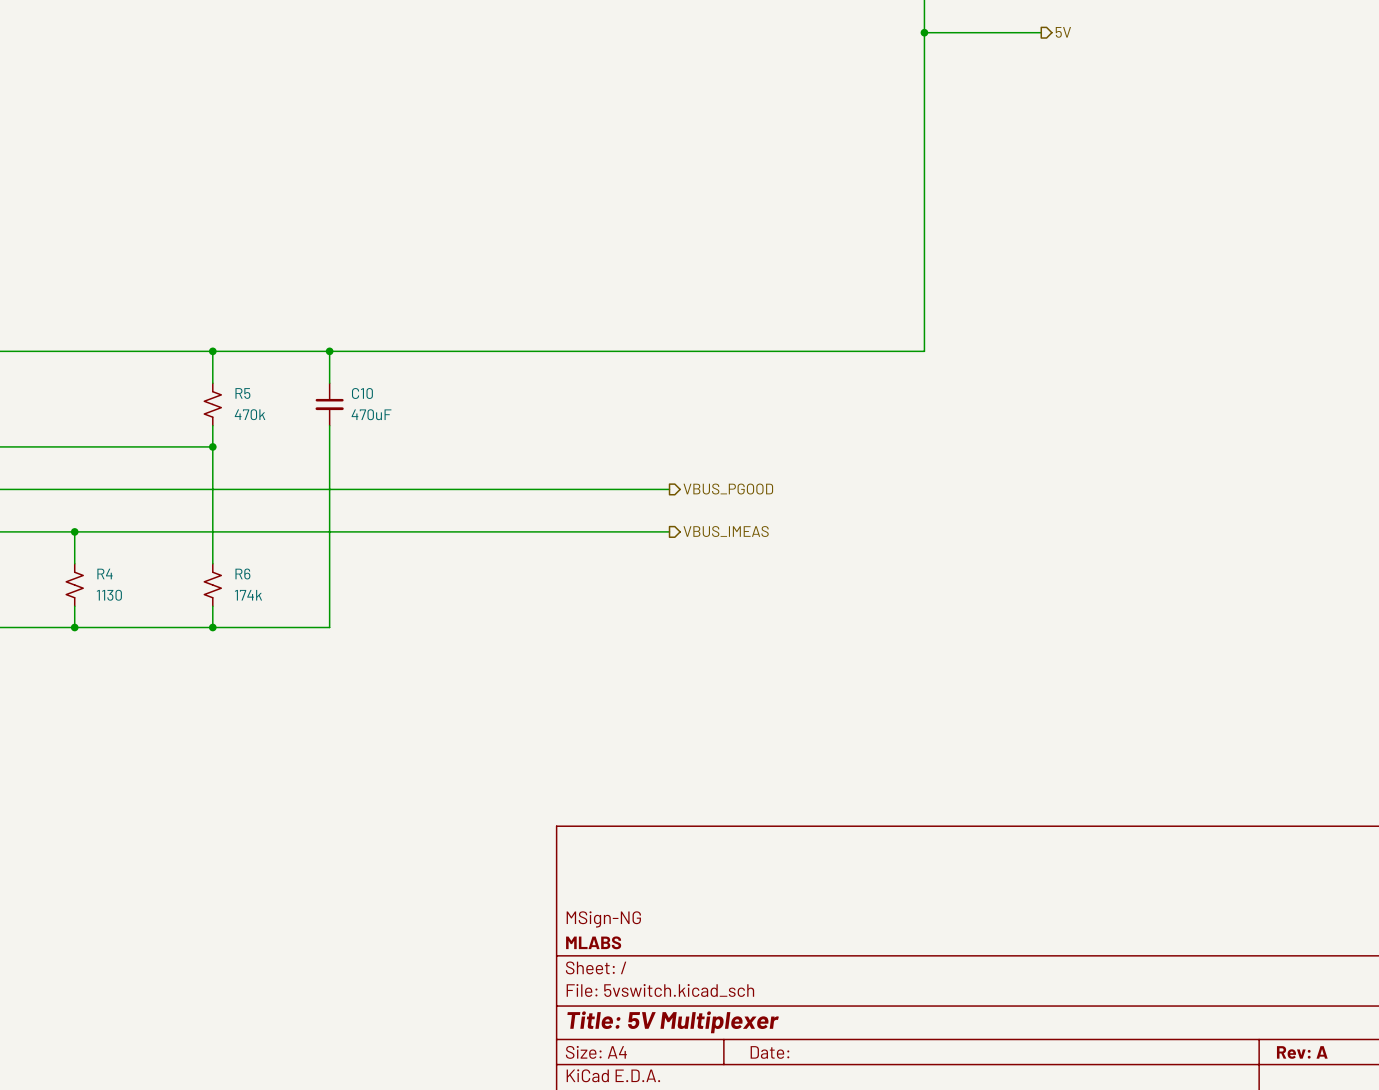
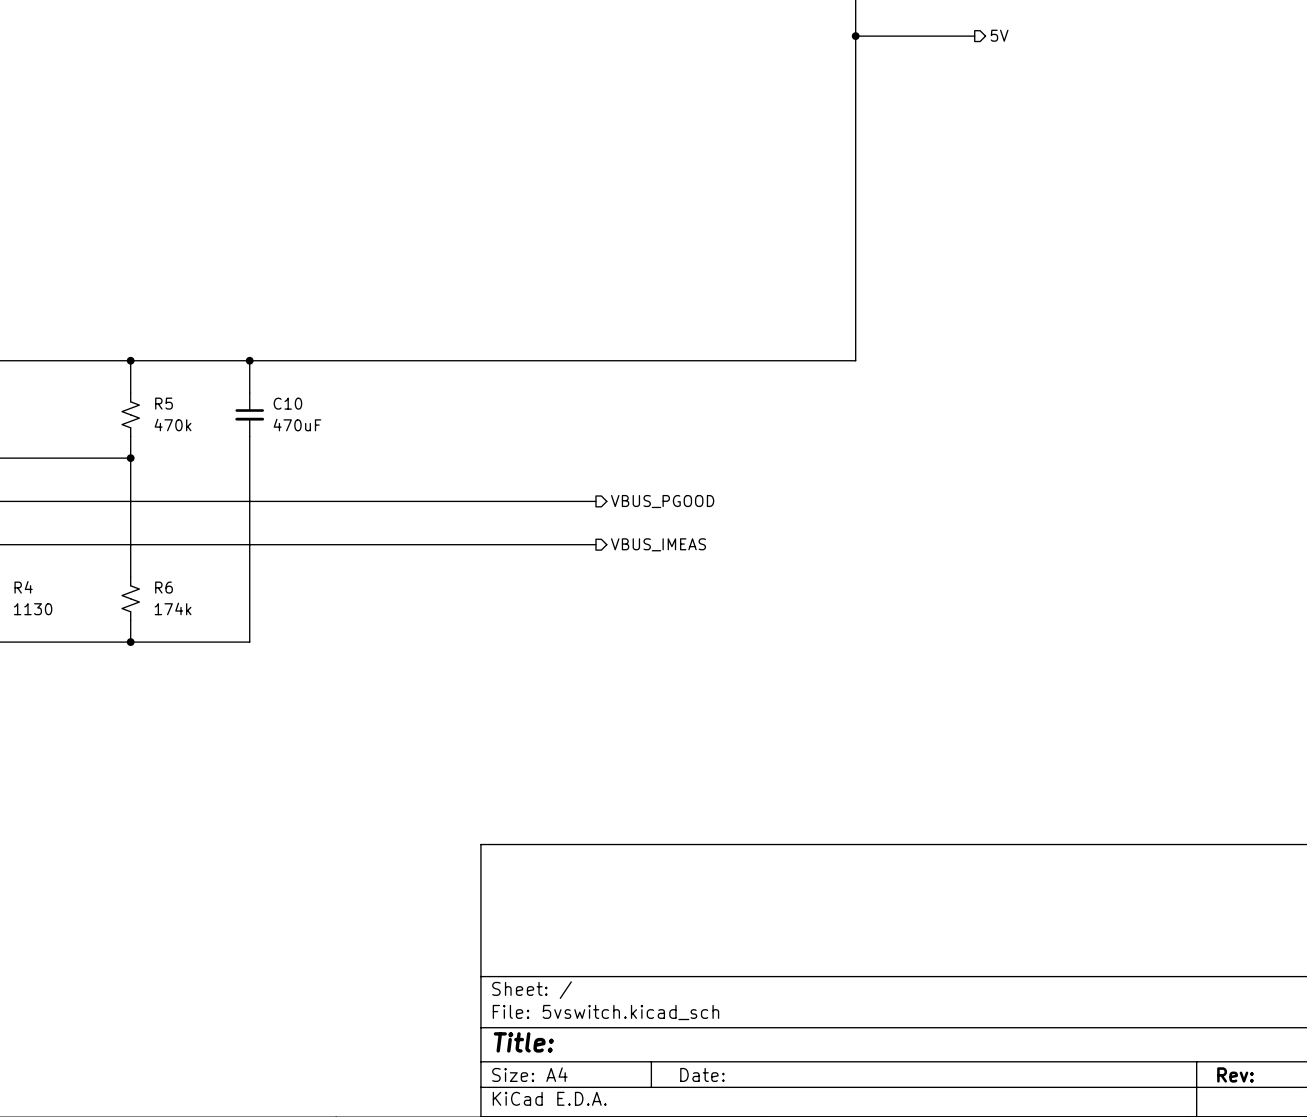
title block: MSign-NG (603, 919) -> none
title block: MLABS (593, 942) -> none
title block: Title: 5V Multiplexer (673, 1022) -> Title: (523, 1042)
title block: Rev: A (1302, 1052) -> Rev: (1235, 1074)

